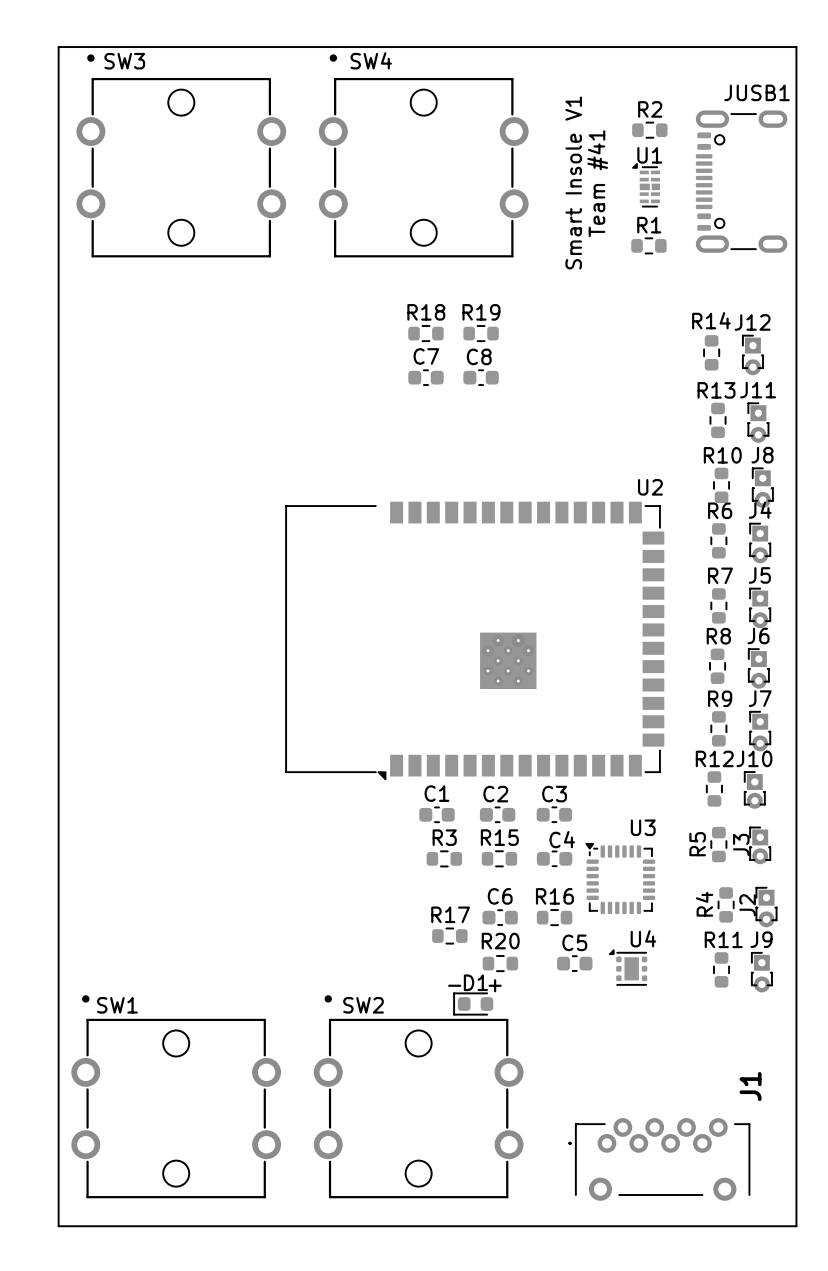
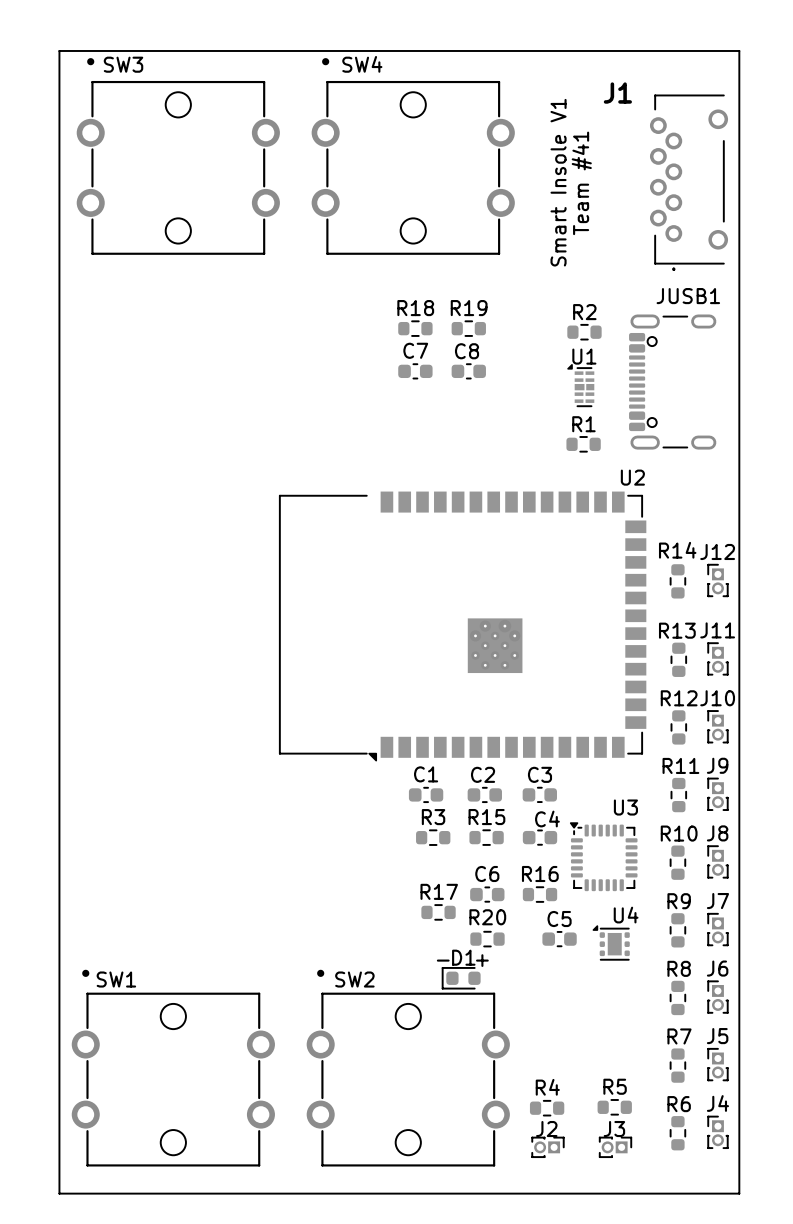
board edge: (760, 47) (796, 47) (796, 1226) (760, 1226) -> (739, 50) (739, 1193)
JUSB1 footprint: [695, 110, 788, 253] -> [629, 314, 717, 450]
R2 position: (649, 130) -> (584, 332)
U1 position: (646, 185) -> (580, 385)
R1 position: (648, 245) -> (583, 444)
J12 footprint: [742, 334, 764, 376] -> [707, 563, 729, 598]
R14 position: (711, 352) -> (677, 581)
J11 footprint: [747, 402, 770, 443] -> [707, 642, 729, 676]
R13 position: (718, 420) -> (678, 659)
J8 footprint: [751, 467, 774, 508] -> [707, 845, 729, 879]
R10 position: (721, 485) -> (677, 862)
J4 footprint: [749, 522, 772, 564] -> [707, 1115, 729, 1149]
R6 position: (718, 540) -> (677, 1133)
J5 footprint: [749, 587, 772, 629] -> [707, 1048, 729, 1082]
R7 position: (718, 605) -> (677, 1065)
J6 footprint: [747, 648, 770, 689] -> [707, 980, 729, 1014]
R8 position: (717, 666) -> (677, 997)
J7 footprint: [749, 710, 772, 752] -> [707, 912, 729, 947]
R9 position: (718, 728) -> (677, 930)
J10 footprint: [743, 771, 766, 809] -> [707, 710, 729, 744]
R12 position: (714, 788) -> (678, 727)
J3 footprint: [749, 826, 772, 865] -> [598, 1136, 633, 1158]
R5 rotation: 0° (718, 844) -> 90° clockwise (614, 1107)
R5 position: (718, 844) -> (614, 1107)
J2 footprint: [755, 886, 778, 928] -> [531, 1136, 565, 1158]
R4 rotation: 0° (726, 904) -> 90° clockwise (547, 1108)
R4 position: (726, 904) -> (547, 1108)
J9 footprint: [751, 951, 773, 993] -> [707, 777, 729, 811]
R11 position: (721, 969) -> (678, 795)
J1 name position: J1 (750, 1086) -> J1 (617, 93)
J1 footprint: [568, 1118, 751, 1201] -> [649, 94, 729, 271]

